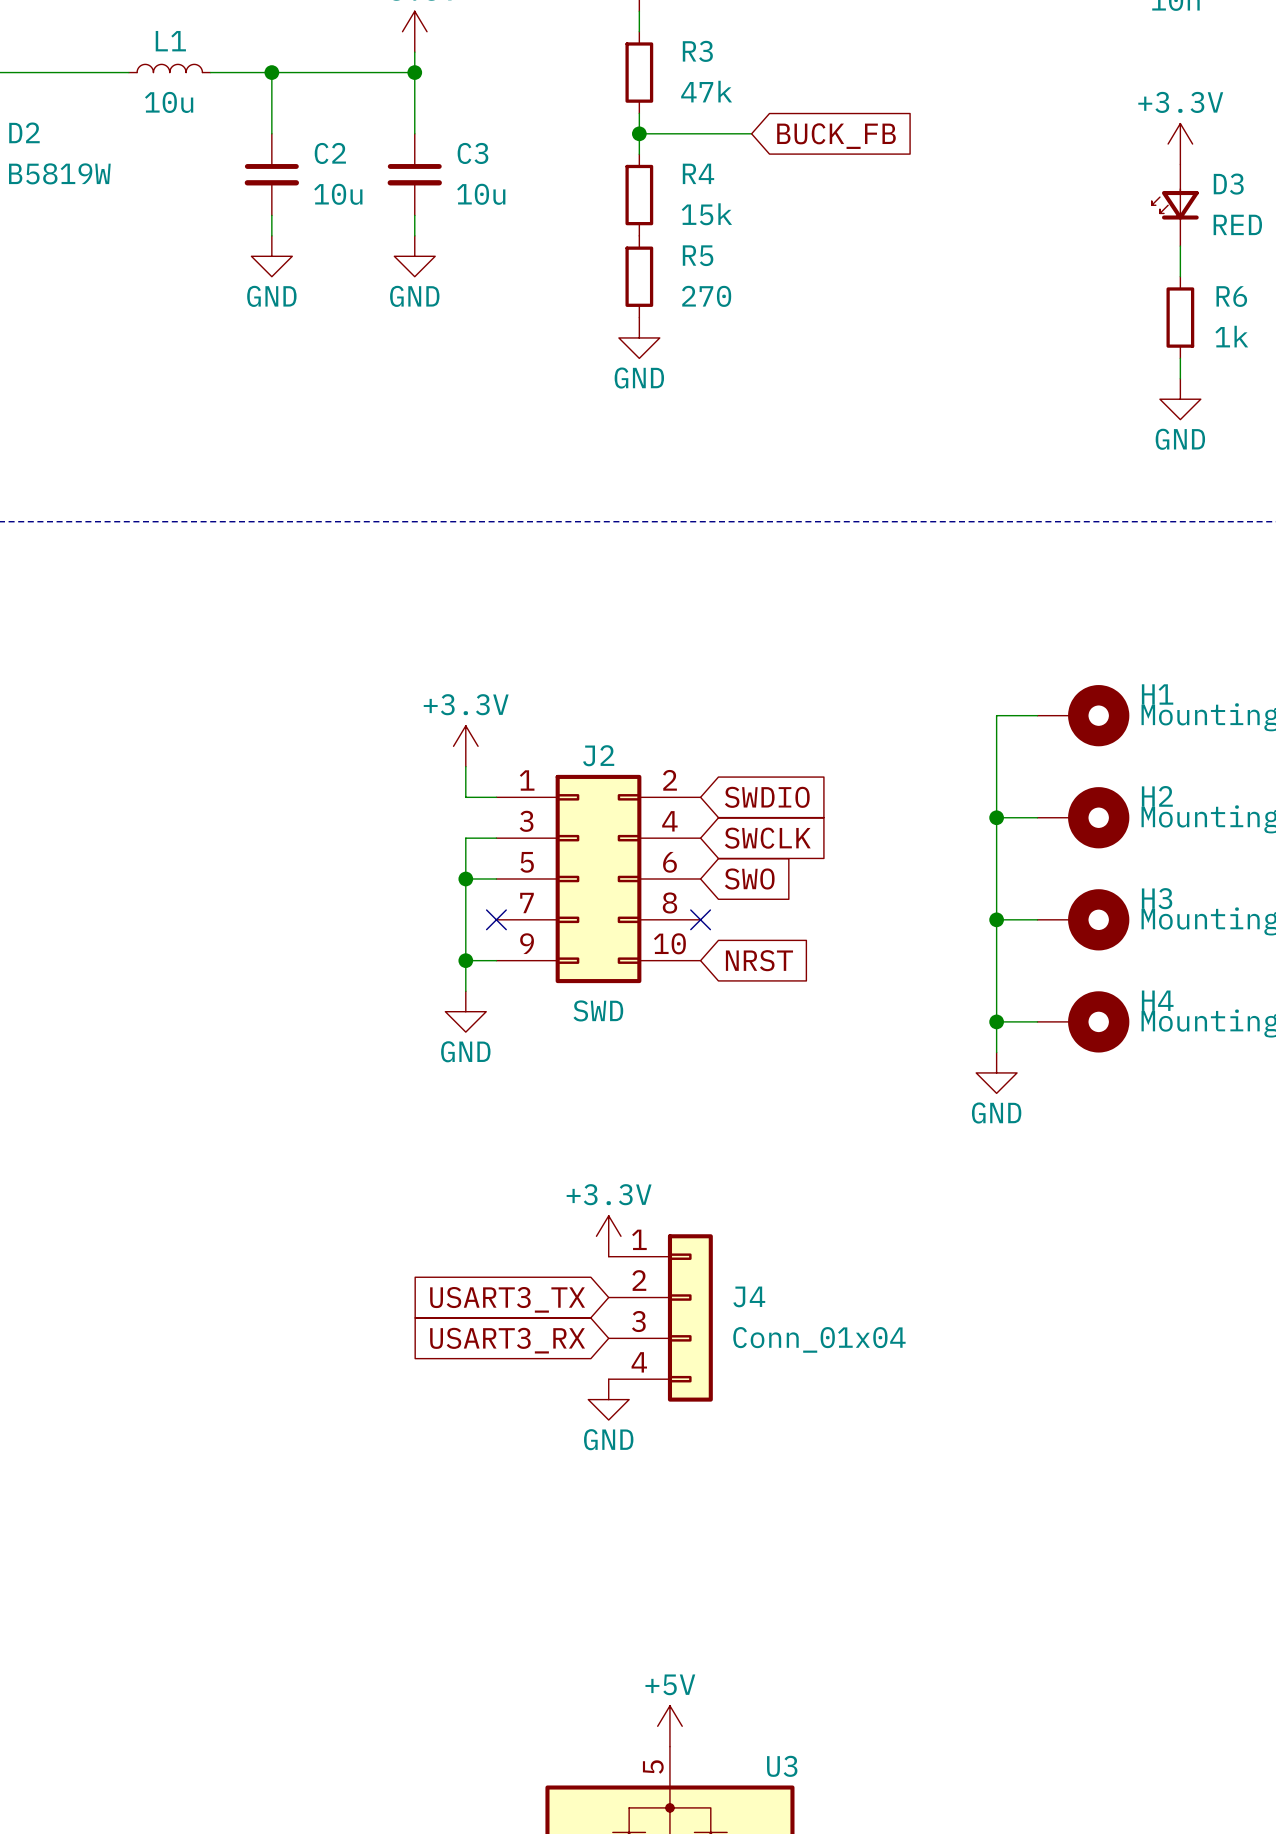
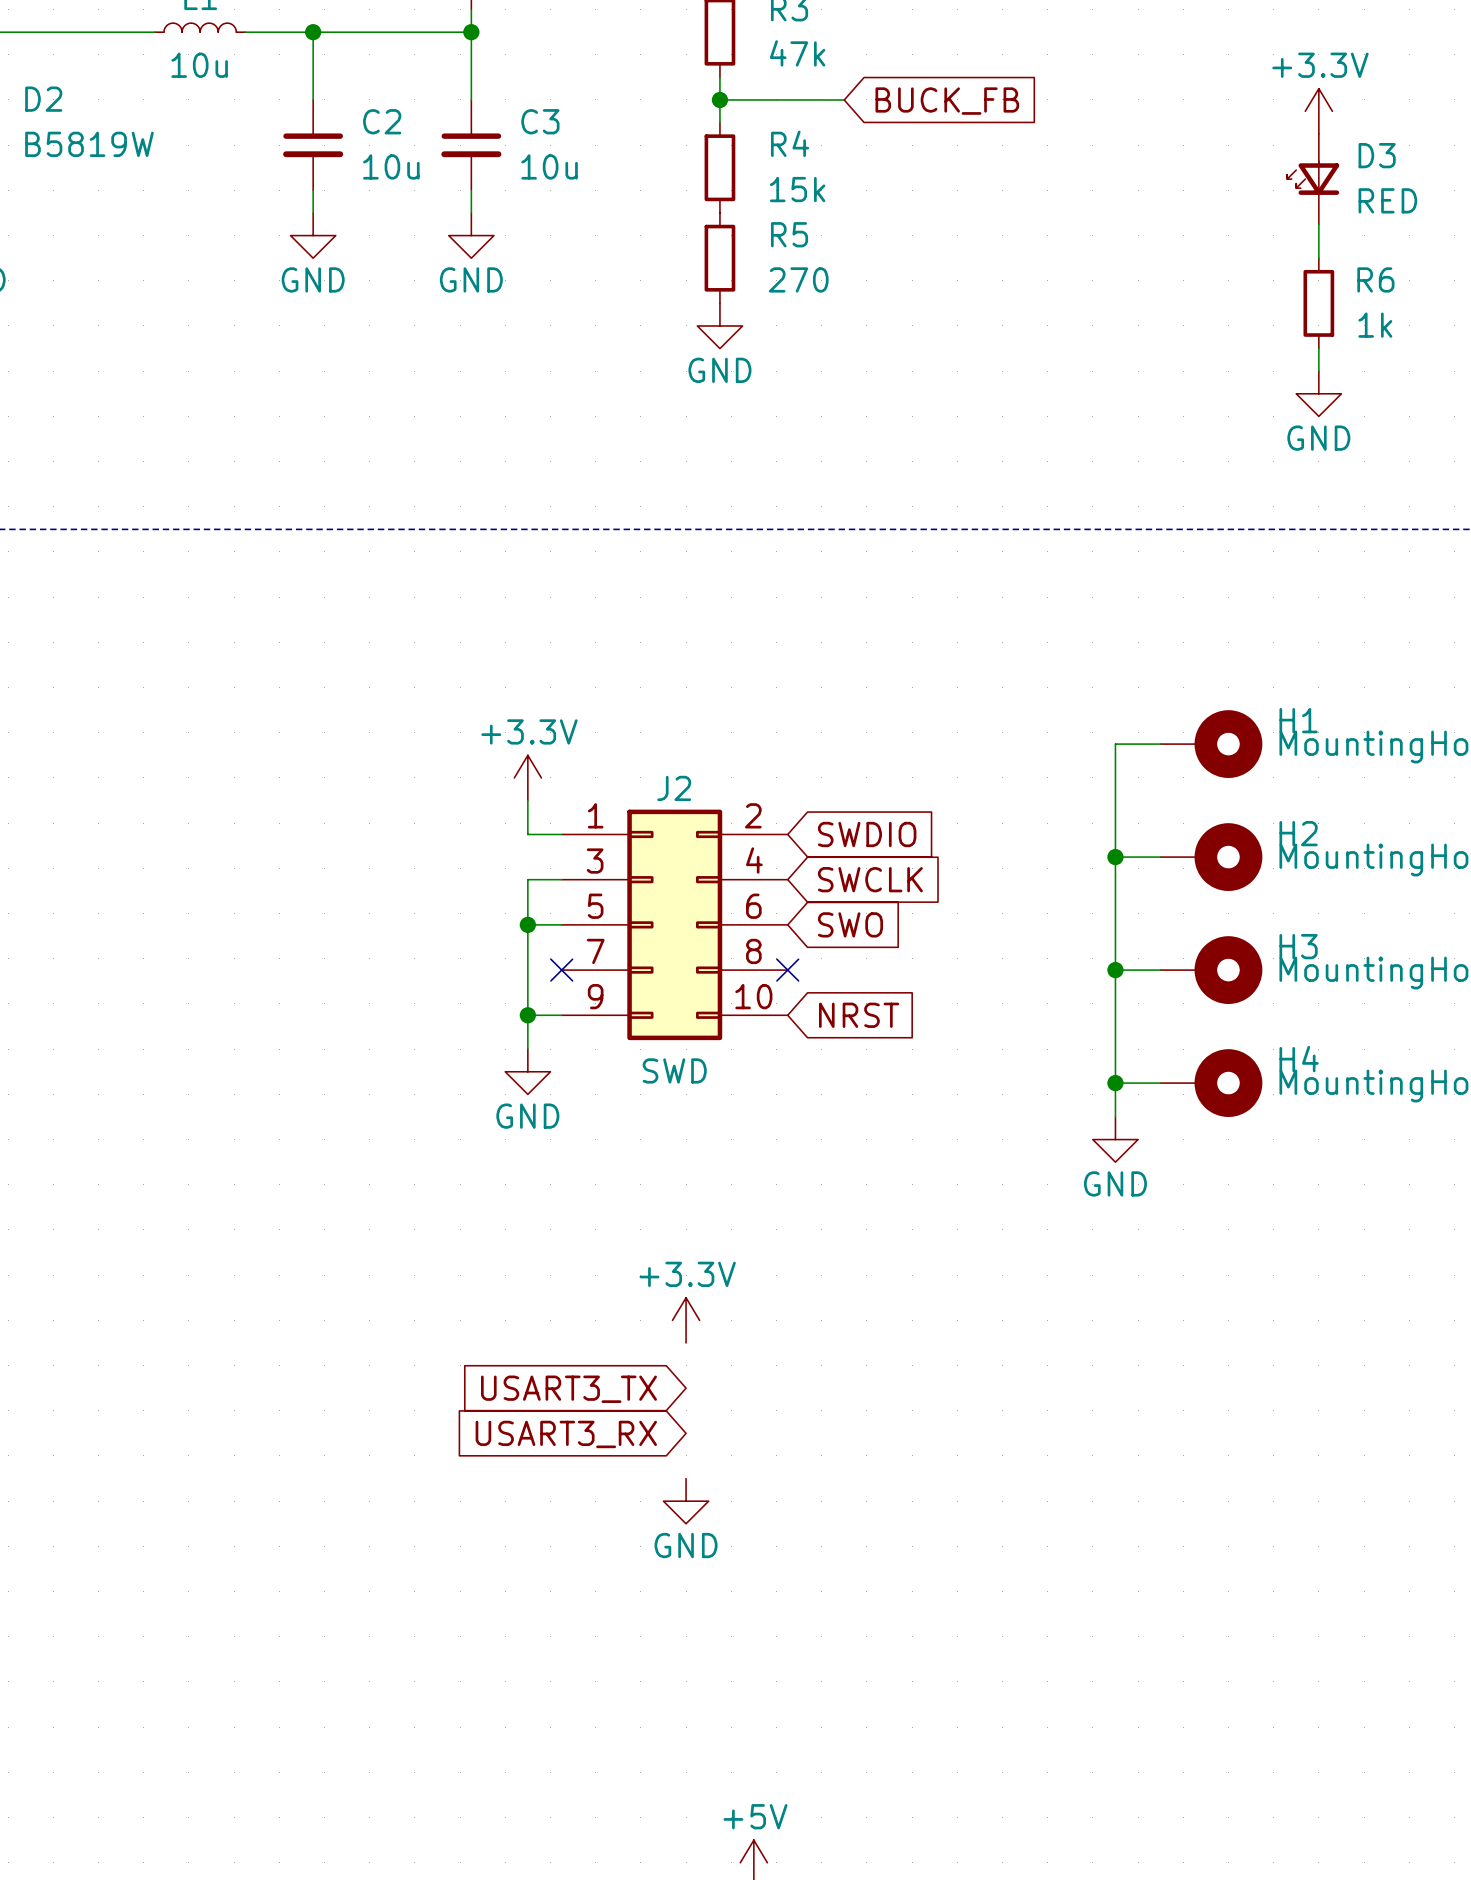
J4: Conn_01x04 (660, 1317) -> none

